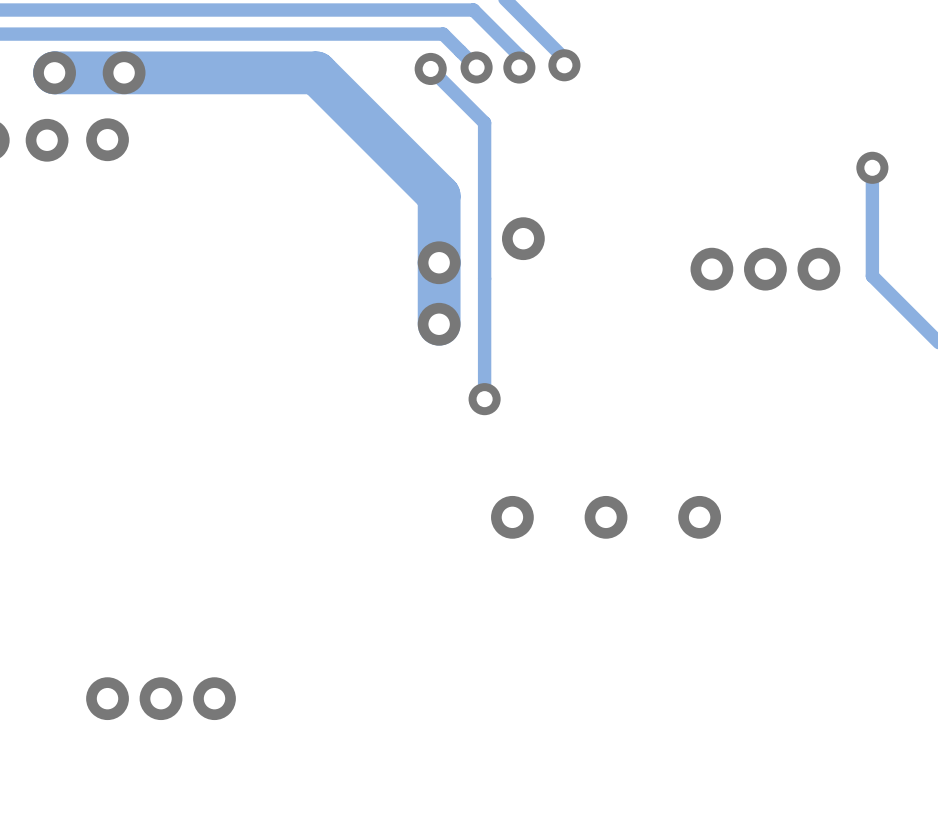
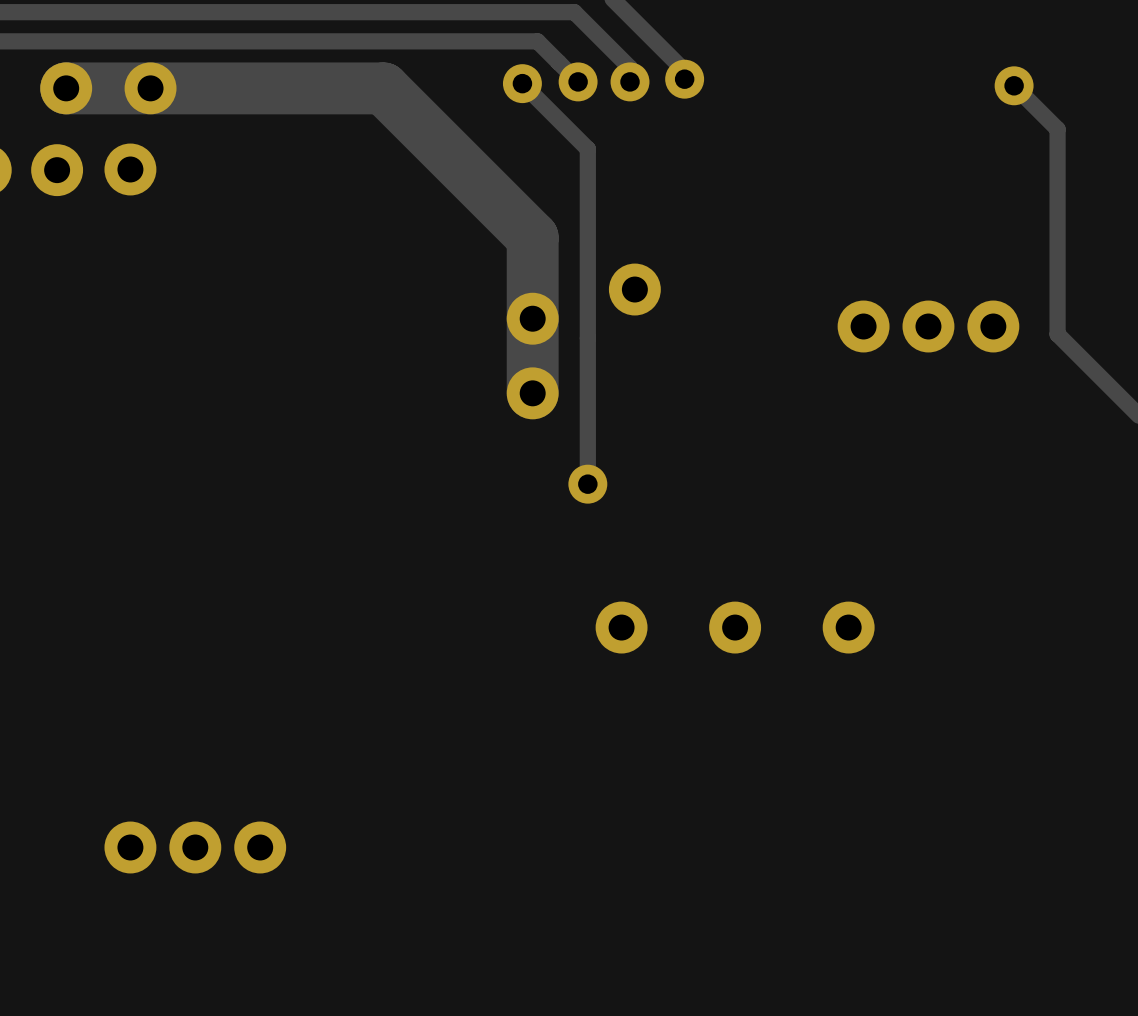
track: (872, 167) (872, 276) -> (1014, 85) (1057, 129) (1057, 334)
via position: (872, 167) -> (1014, 85)

